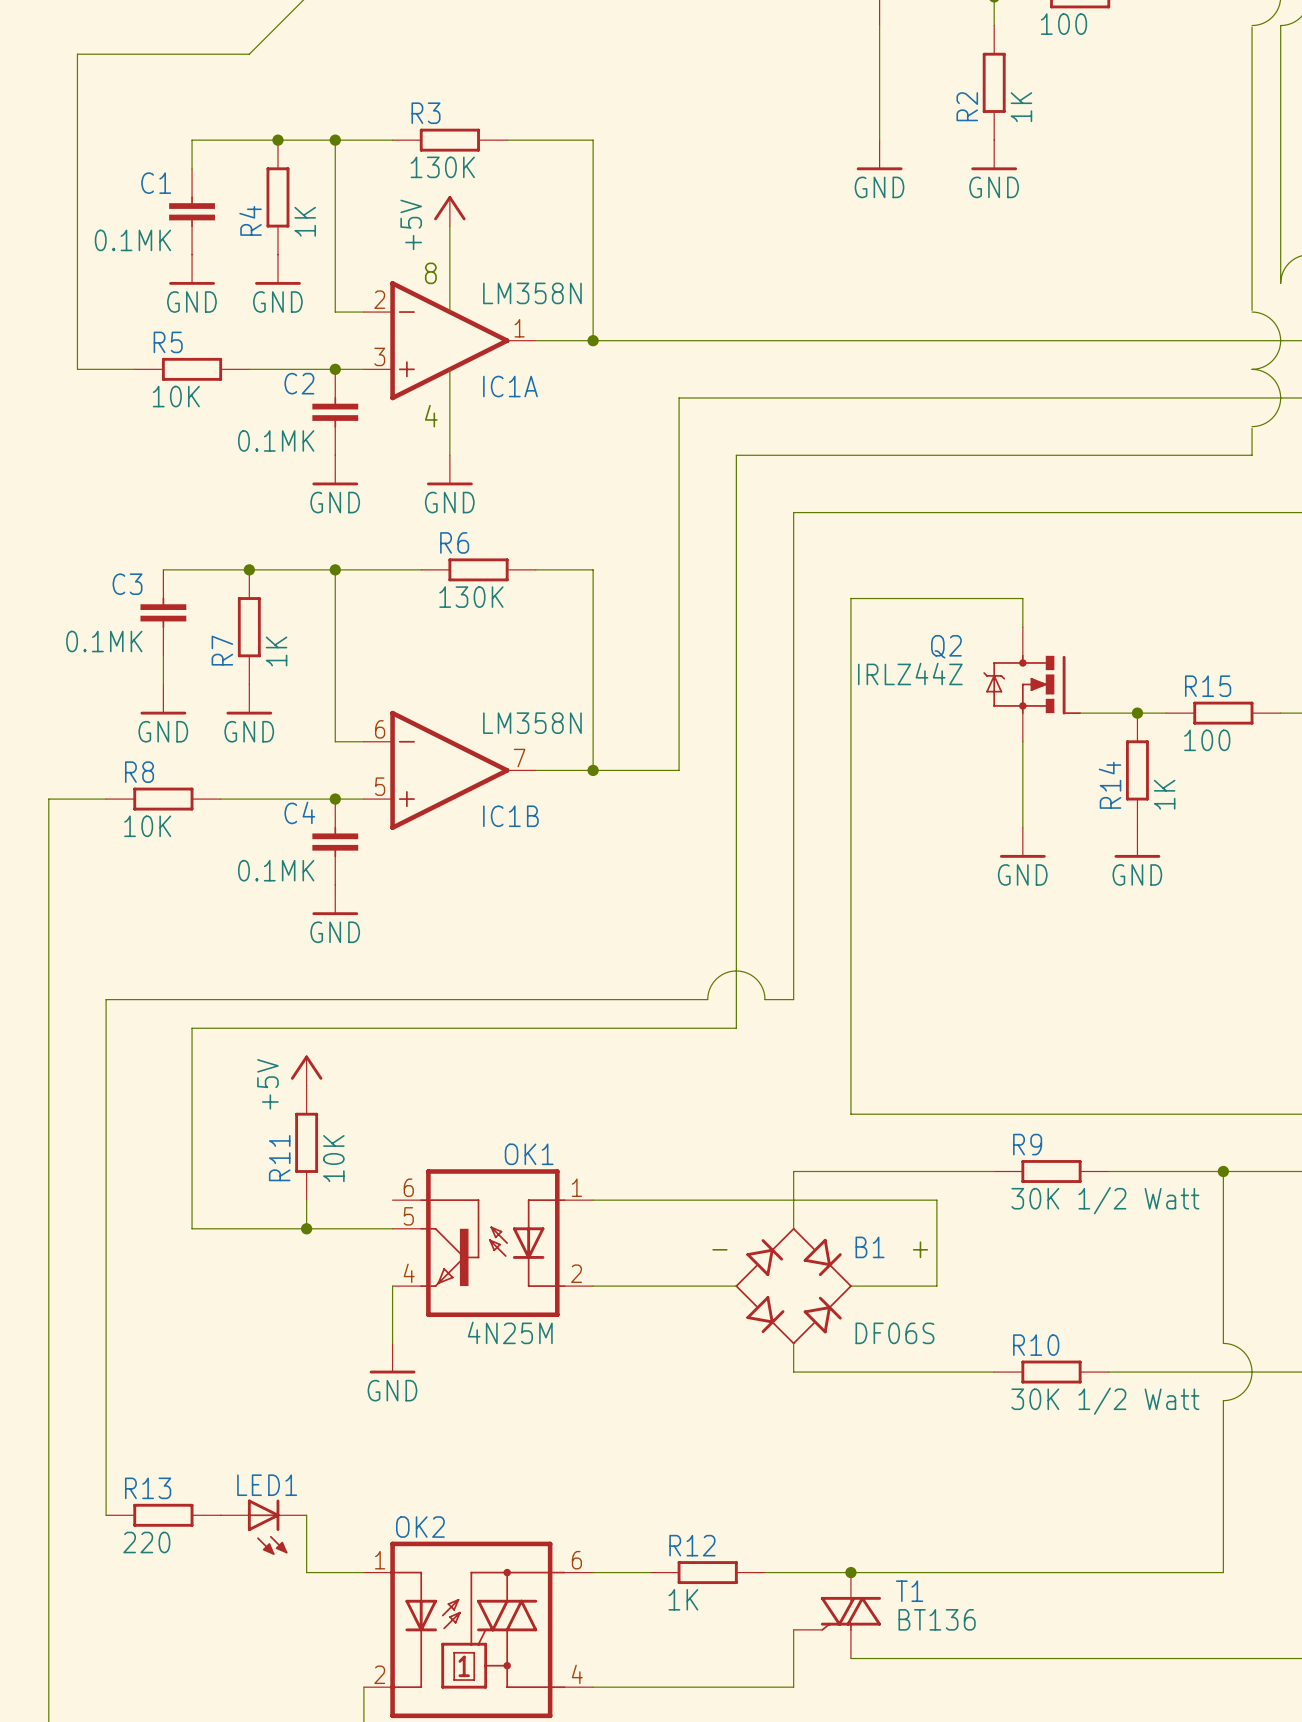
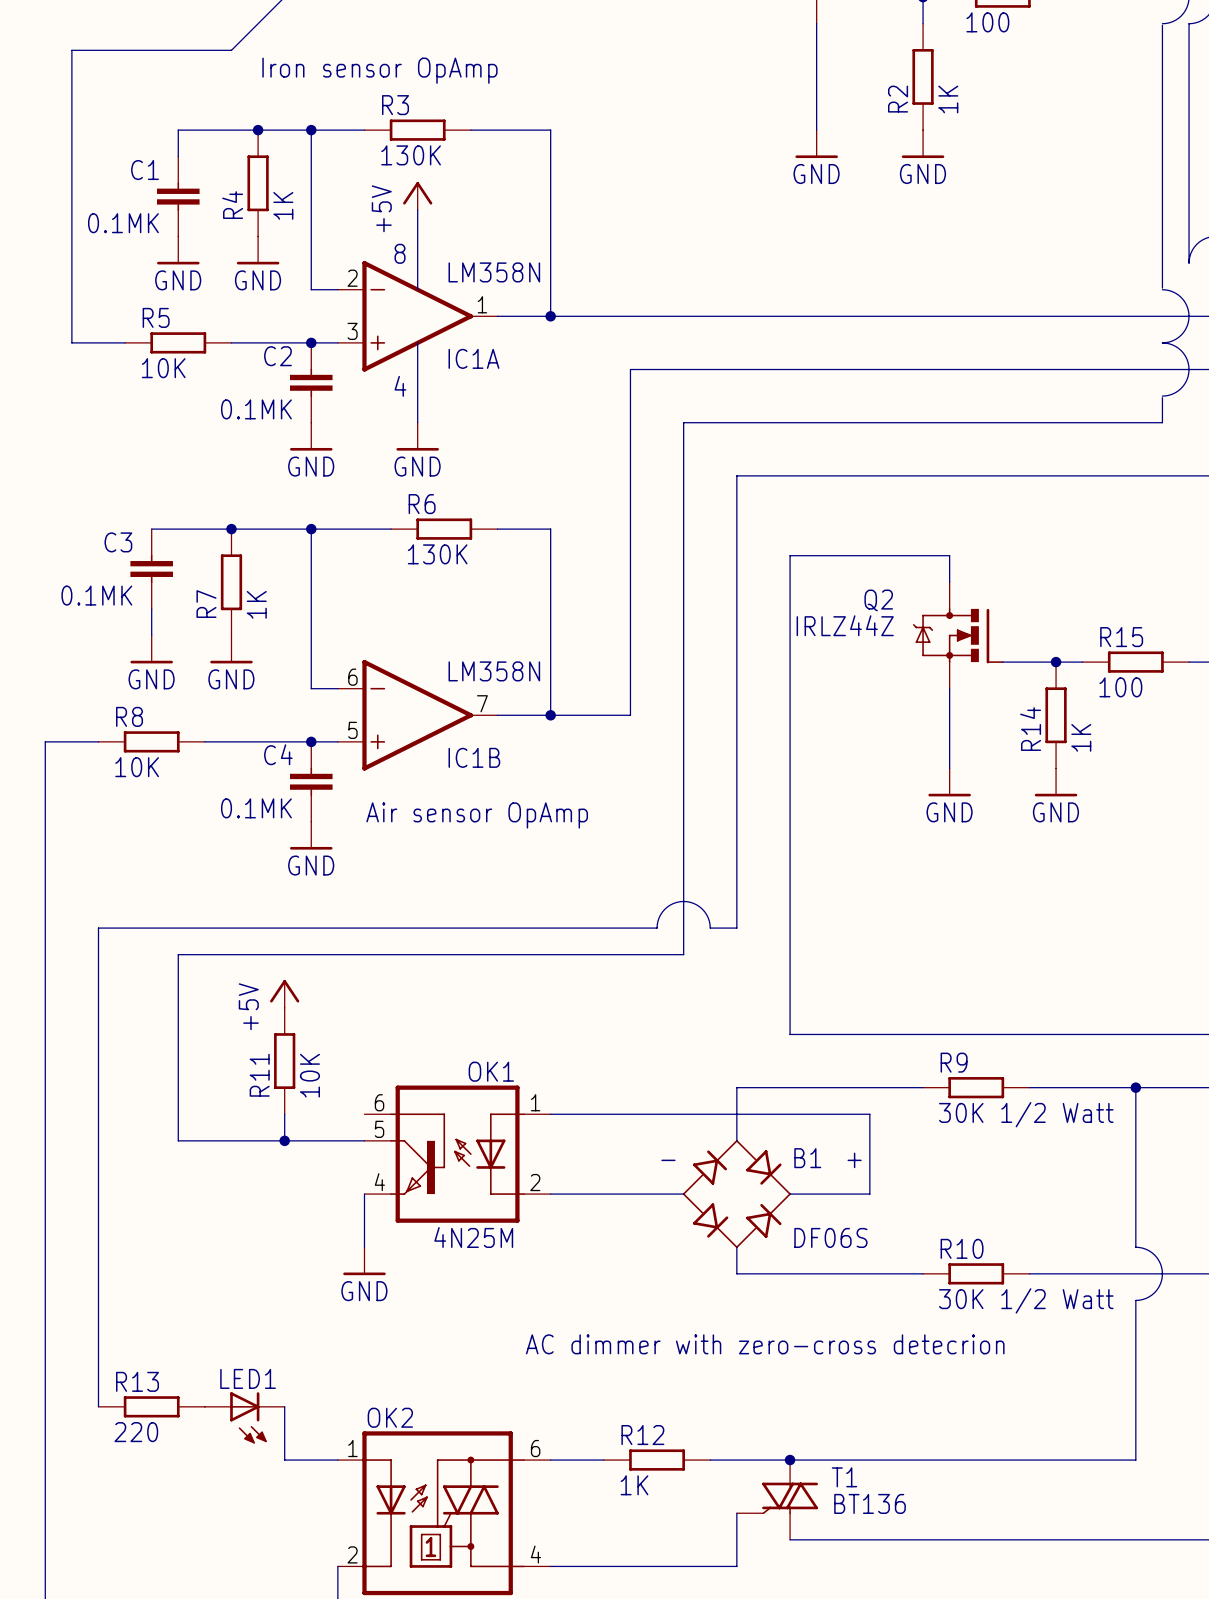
text: none -> Iron sensor OpAmp (379, 70)
text: none -> Air sensor OpAmp (477, 815)
text: none -> AC dimmer with zero-cross detecrion (765, 1344)

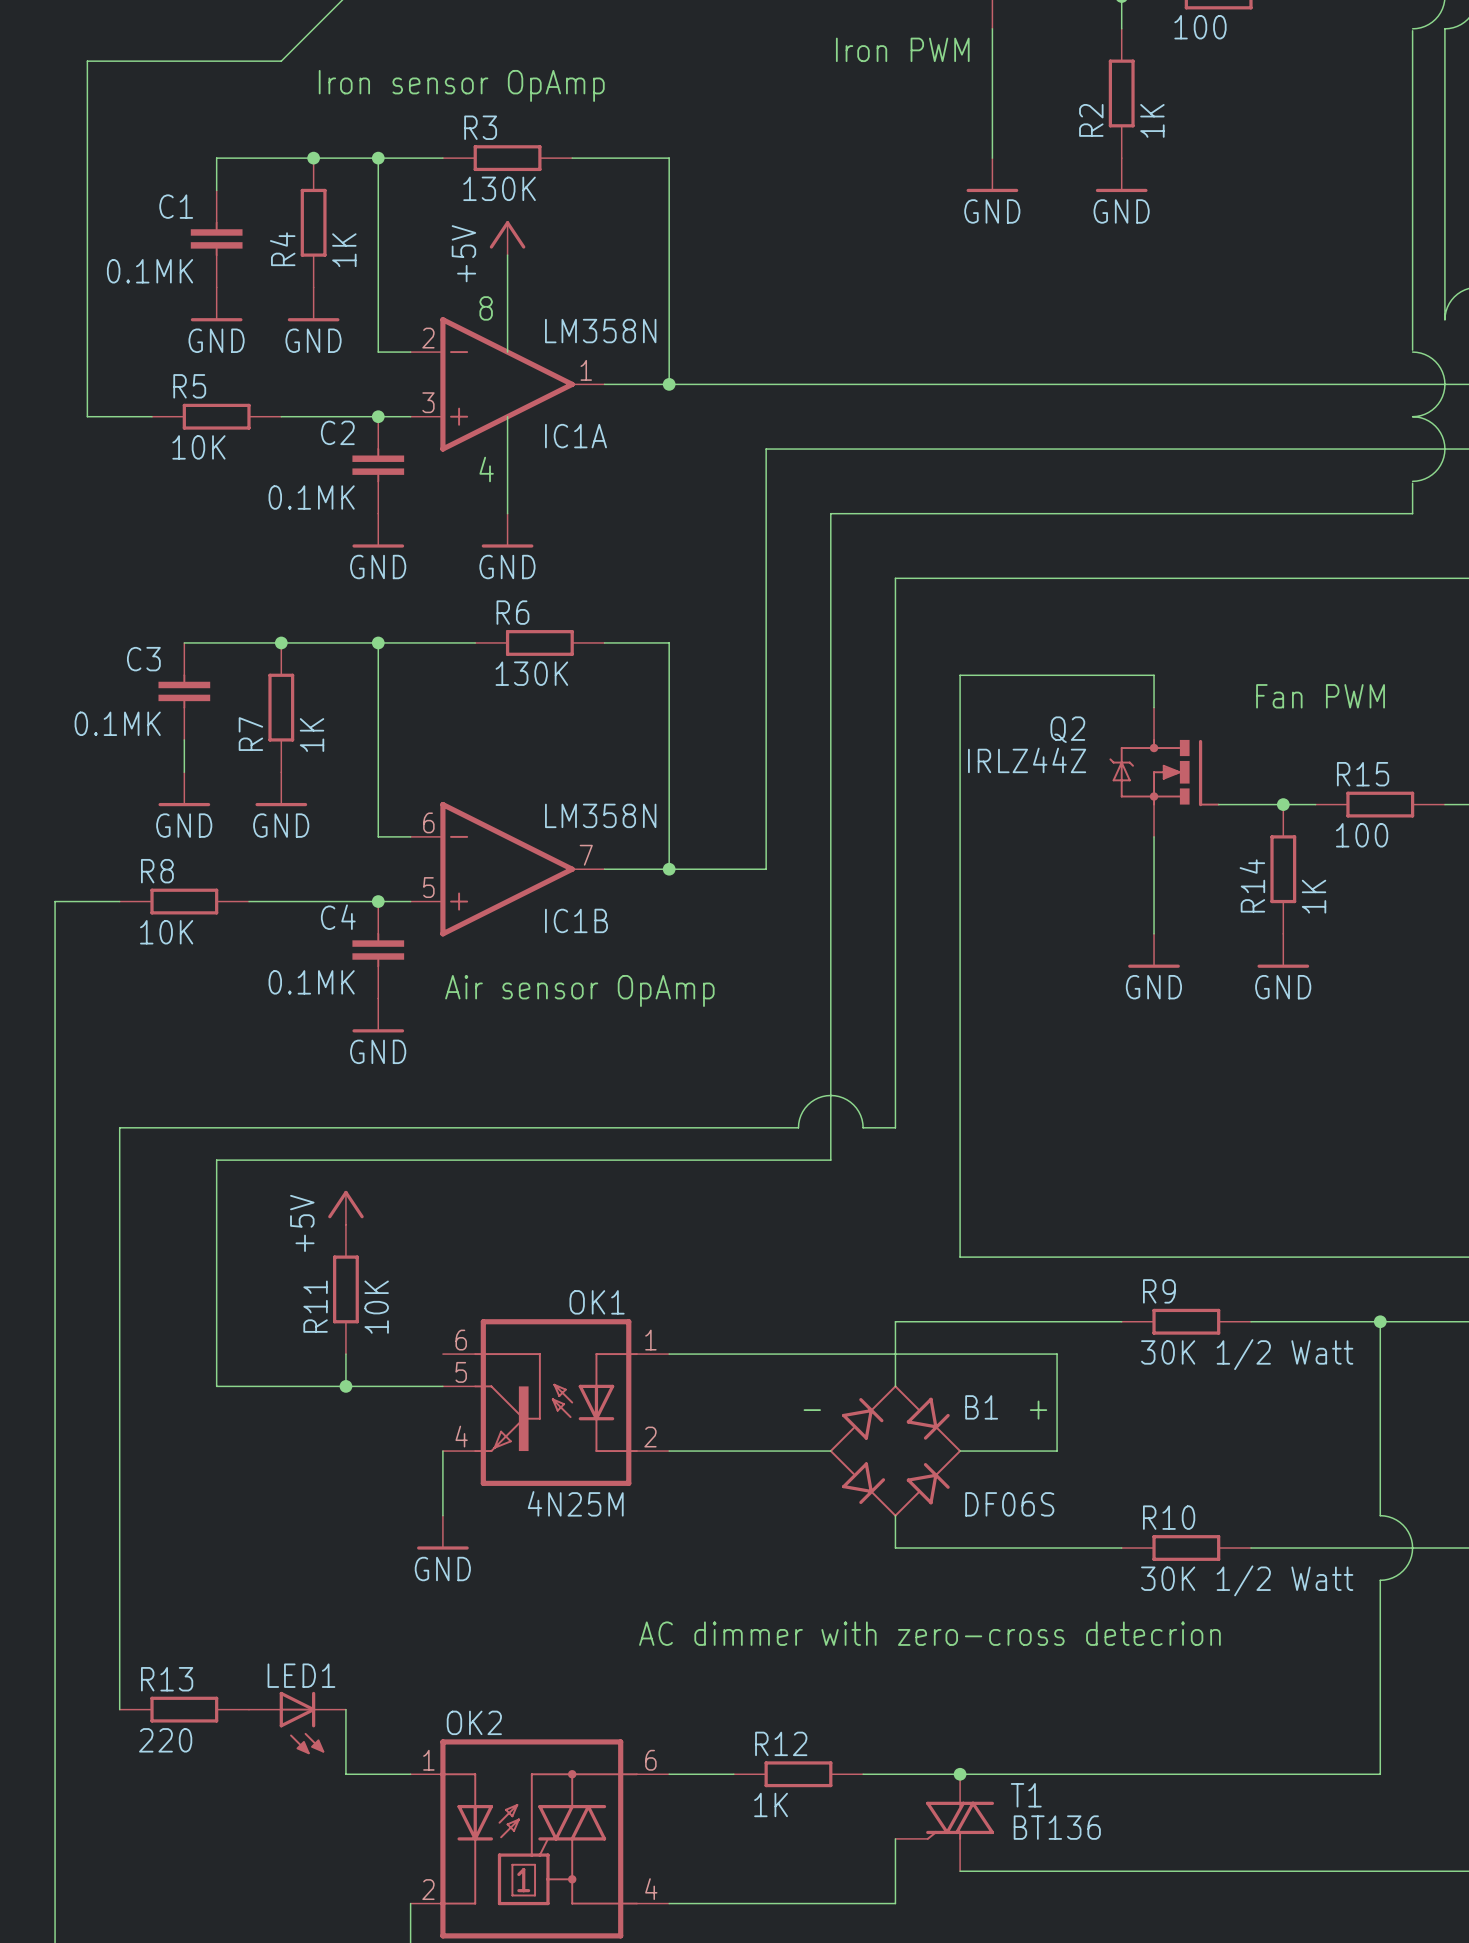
text: none -> Iron PWM (902, 49)
text: none -> Fan PWM (1320, 696)

